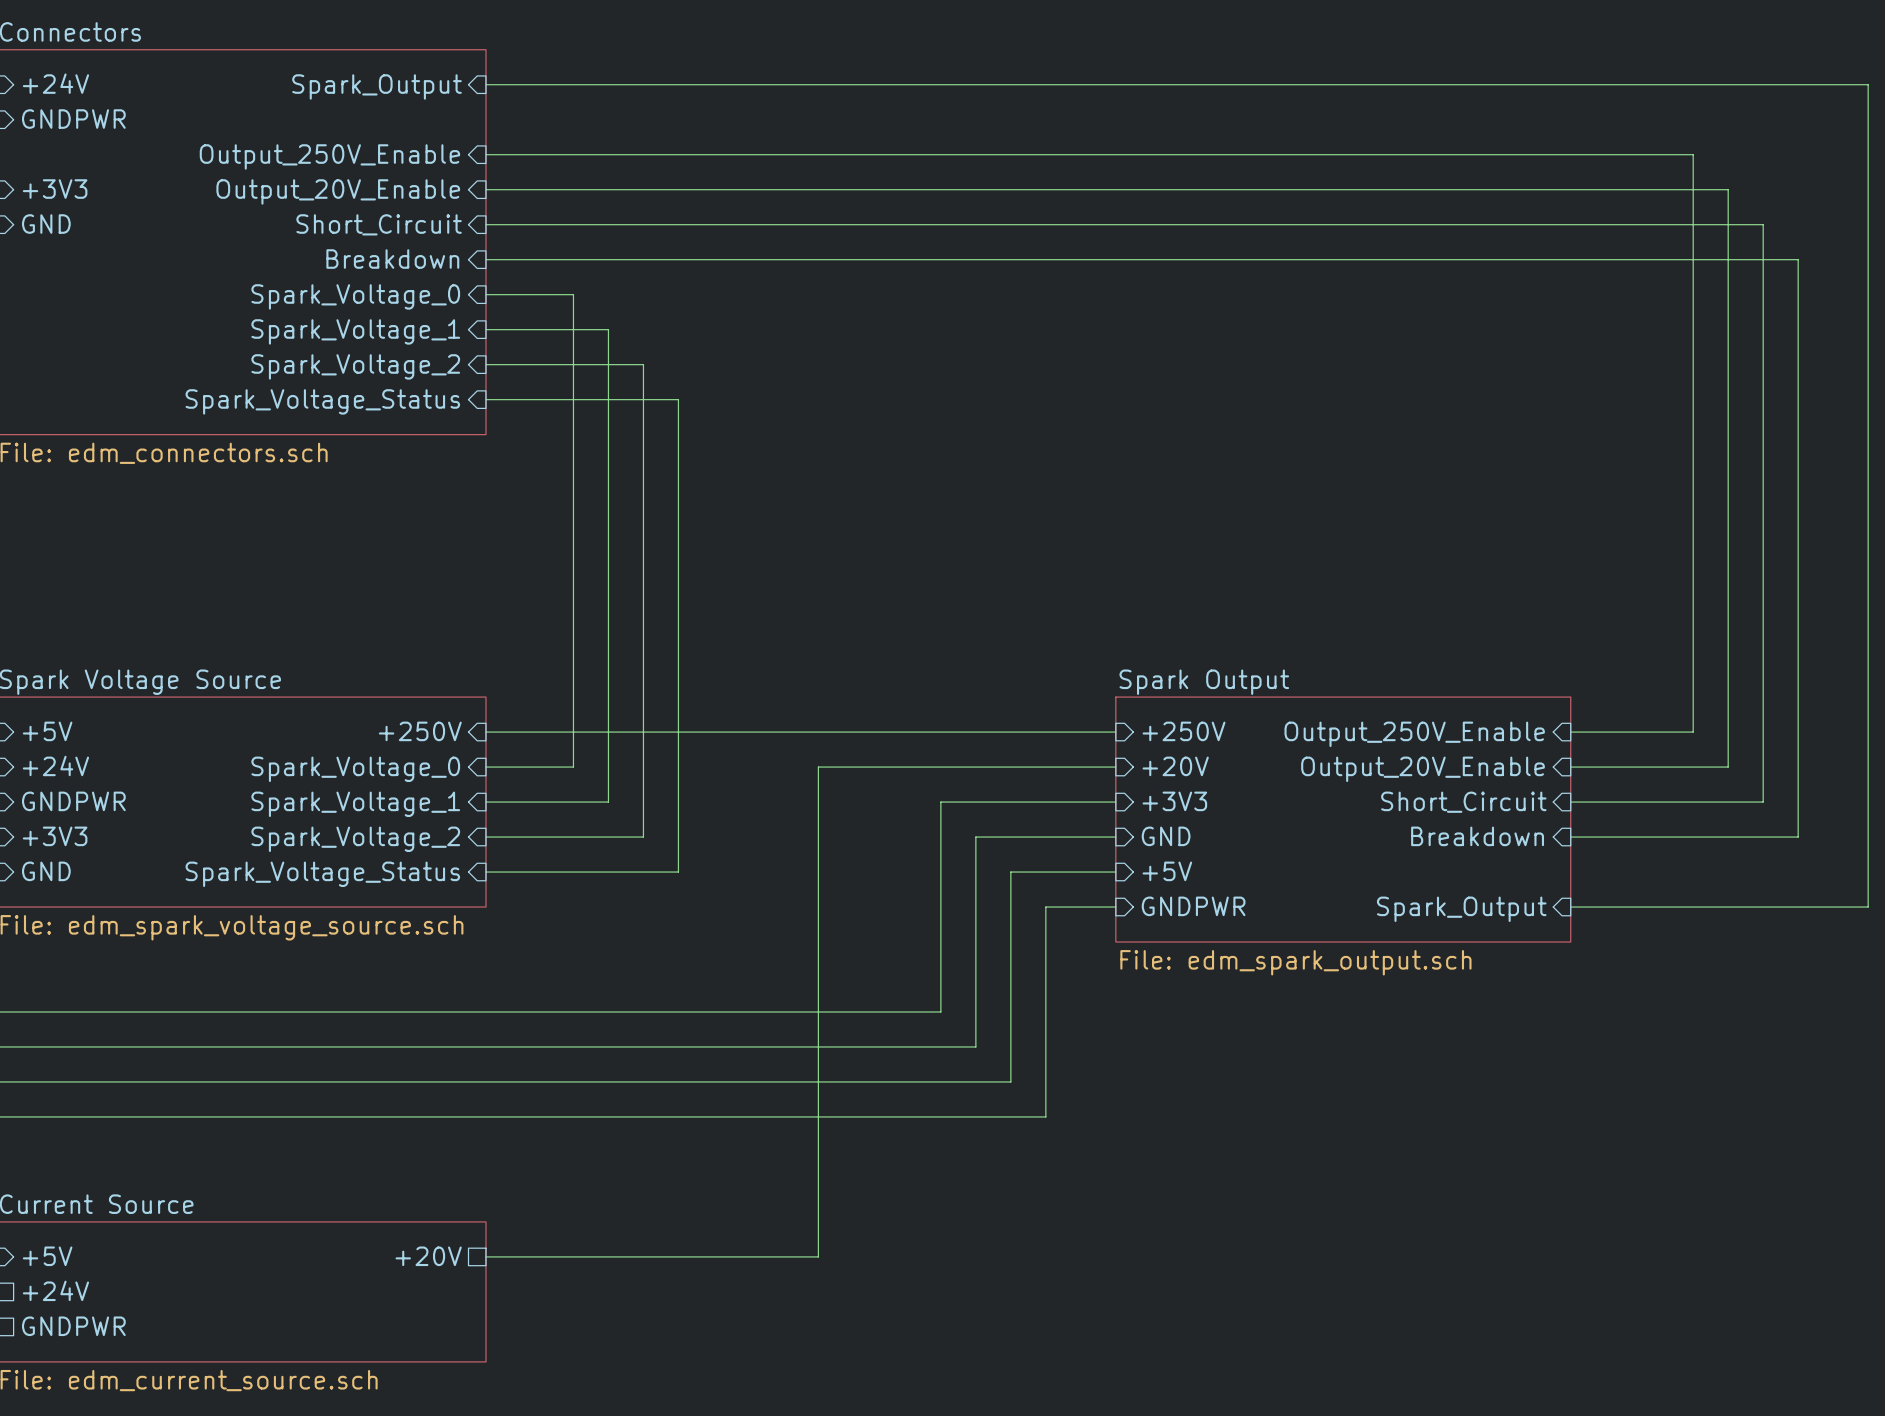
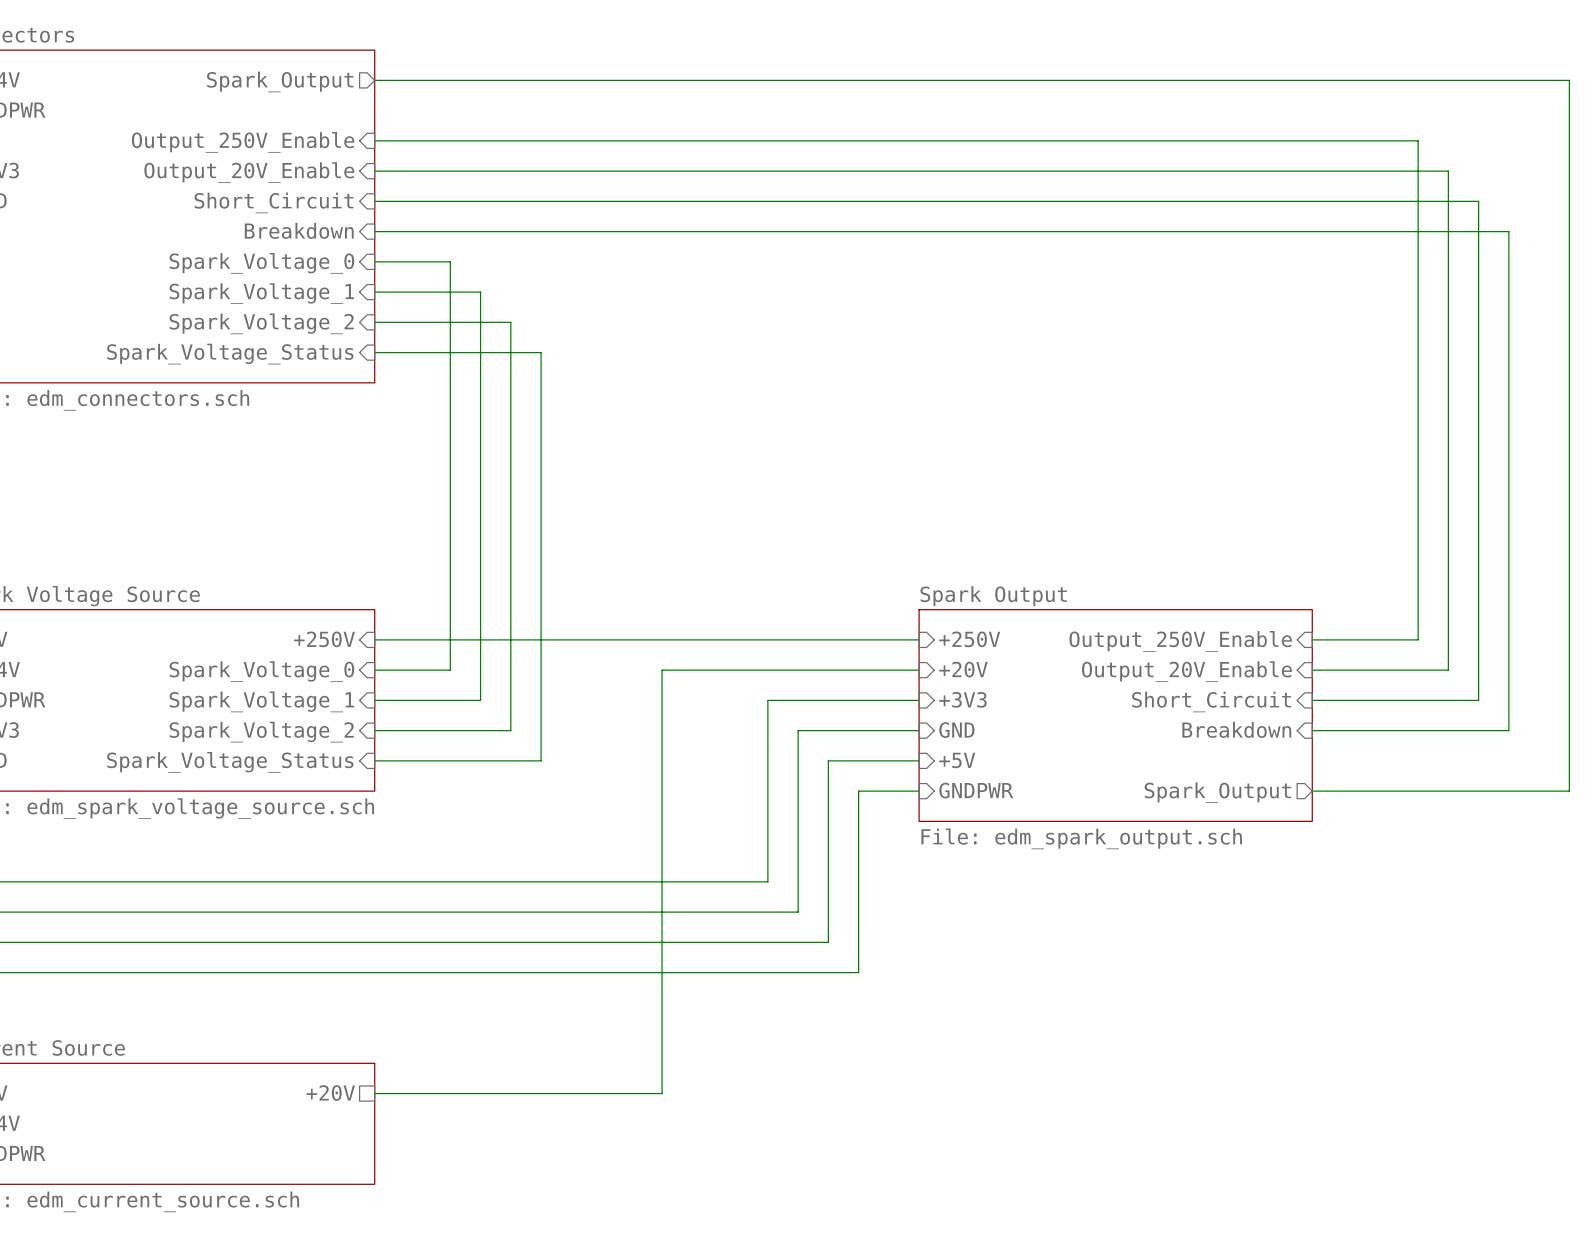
sheet pin: Spark_Output (376, 86) -> none
hierarchical label: none -> Spark_Output (280, 81)
sheet pin: Spark_Output (1461, 909) -> none
hierarchical label: none -> Spark_Output (1217, 792)

